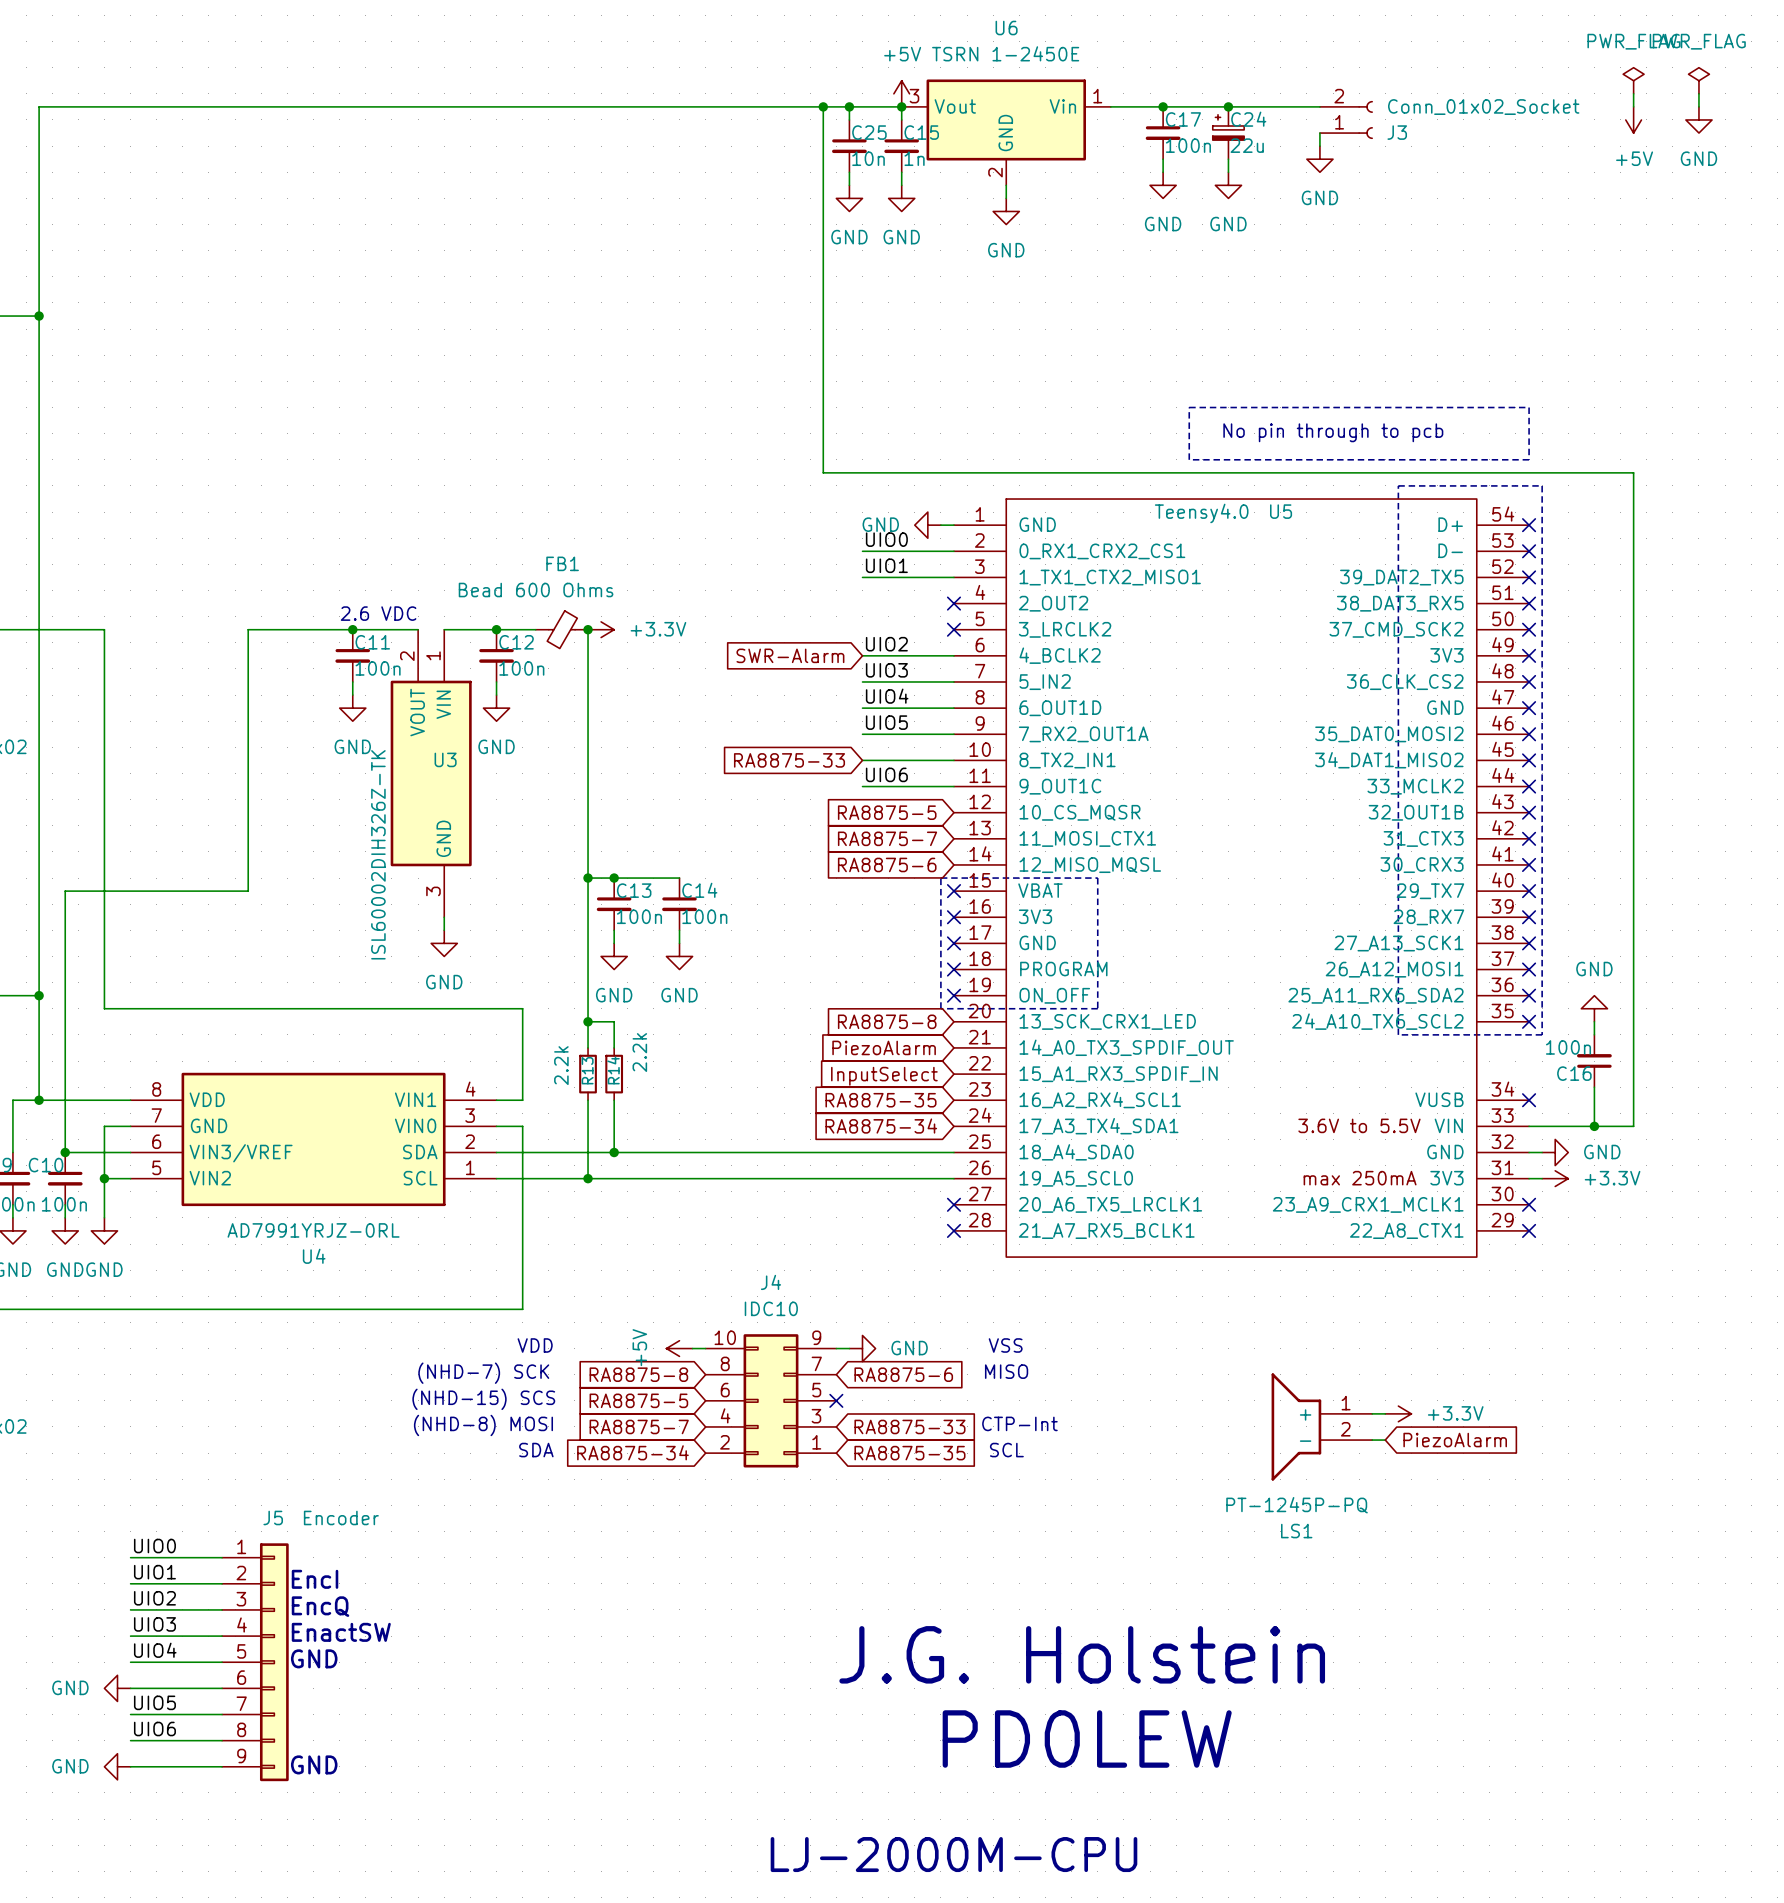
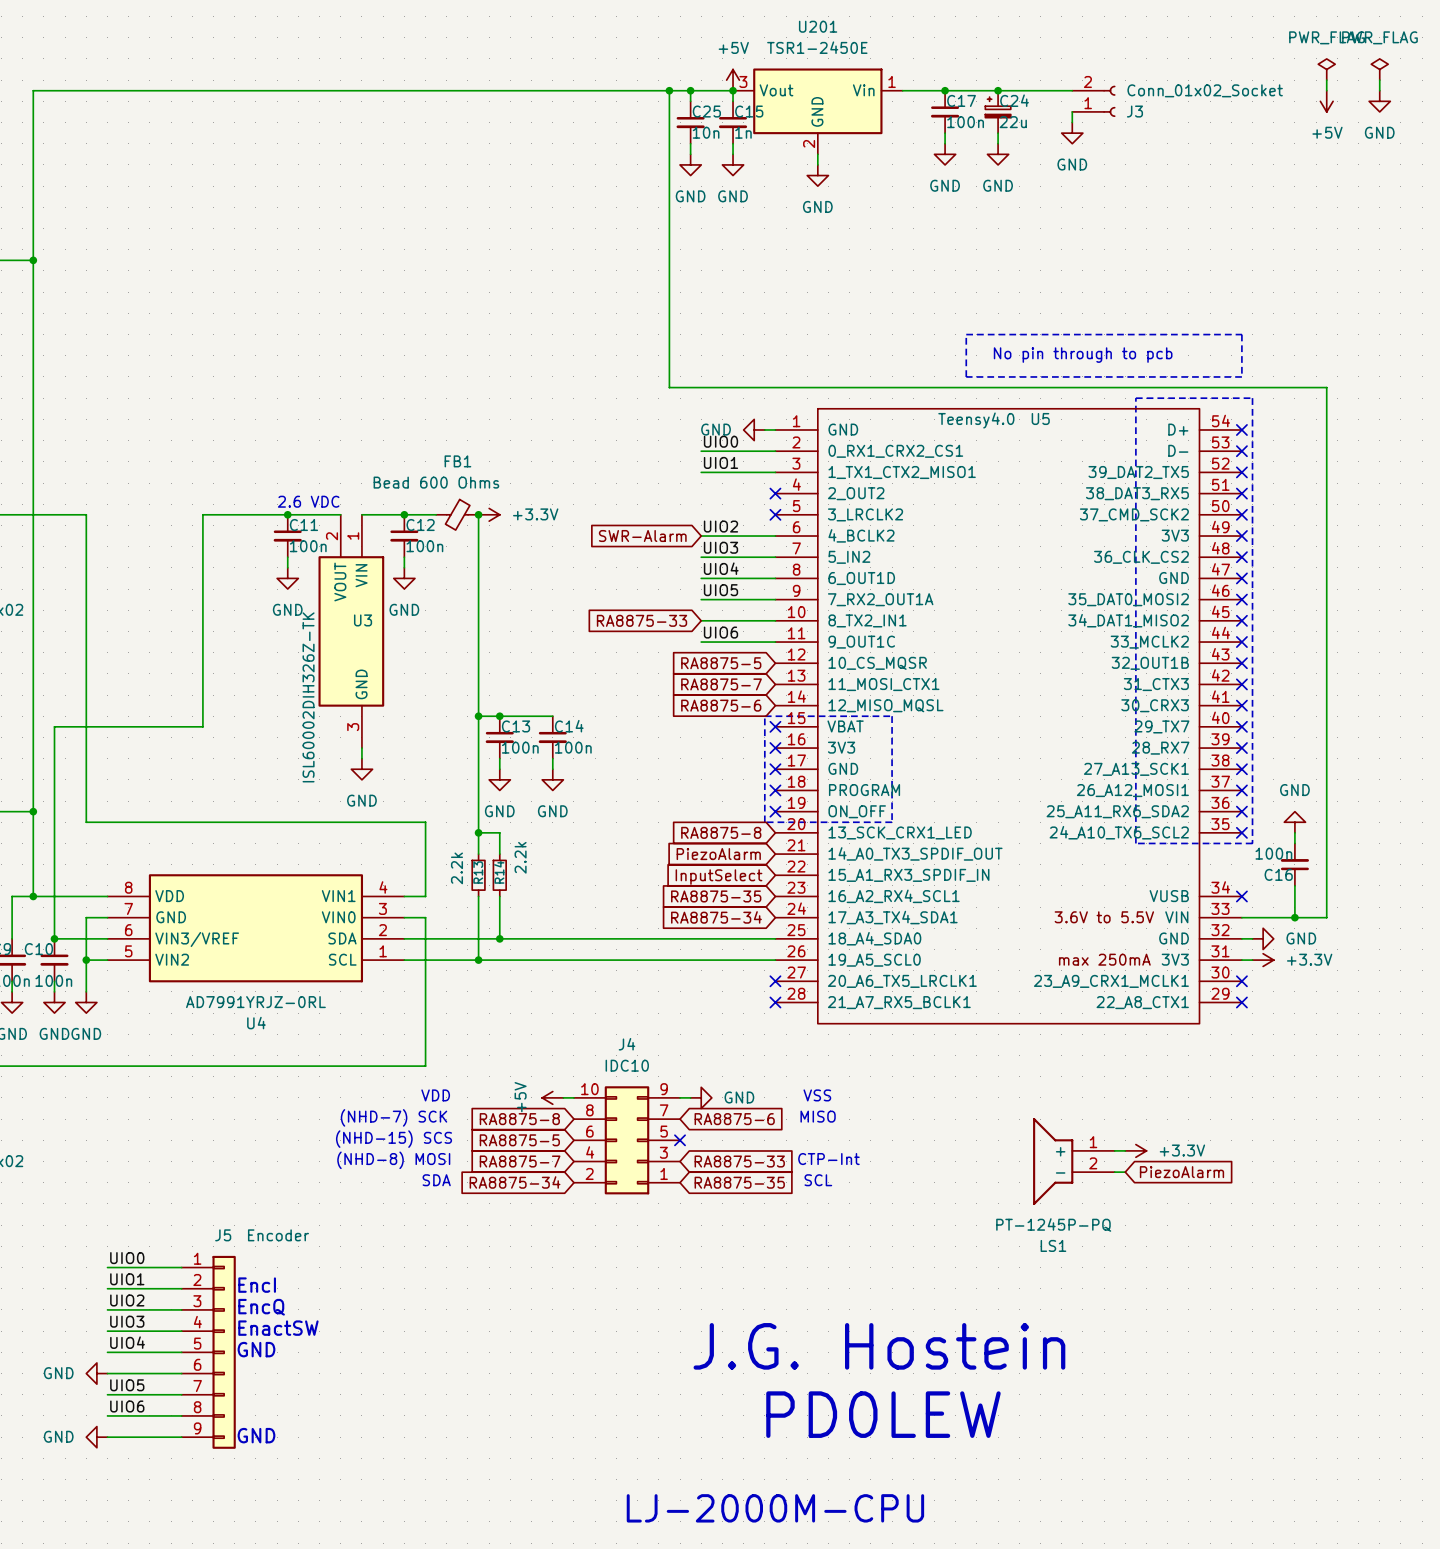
U6 name: U6 (1006, 28) -> U201 (818, 26)
U6 value: TSRN 1-2450E (1005, 53) -> TSR1-2450E (817, 47)
text: J.G. Holstein (1082, 1654) -> J.G. Hostein (879, 1346)

